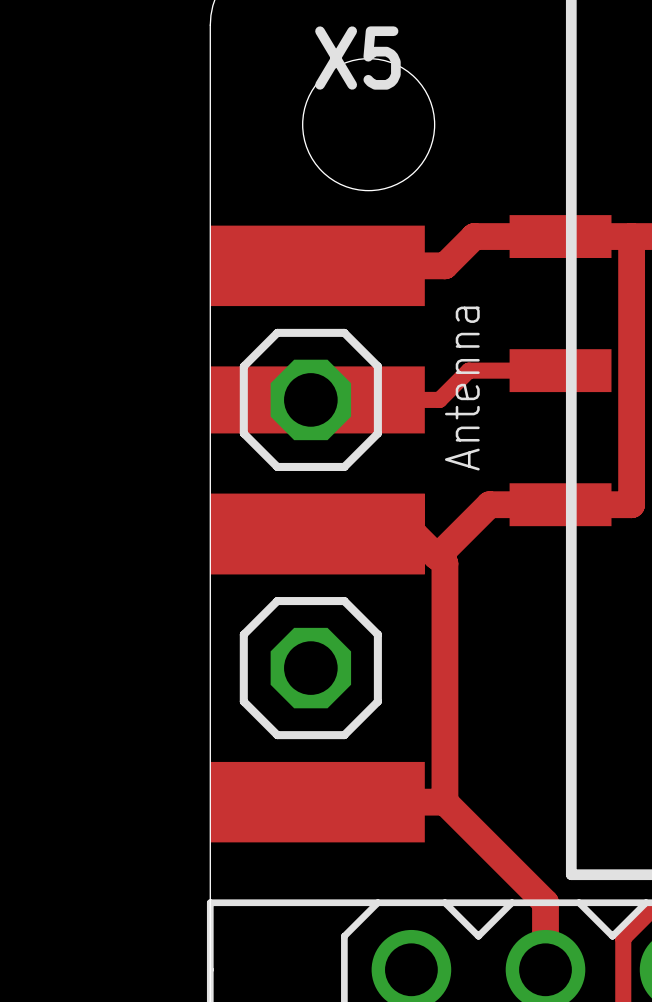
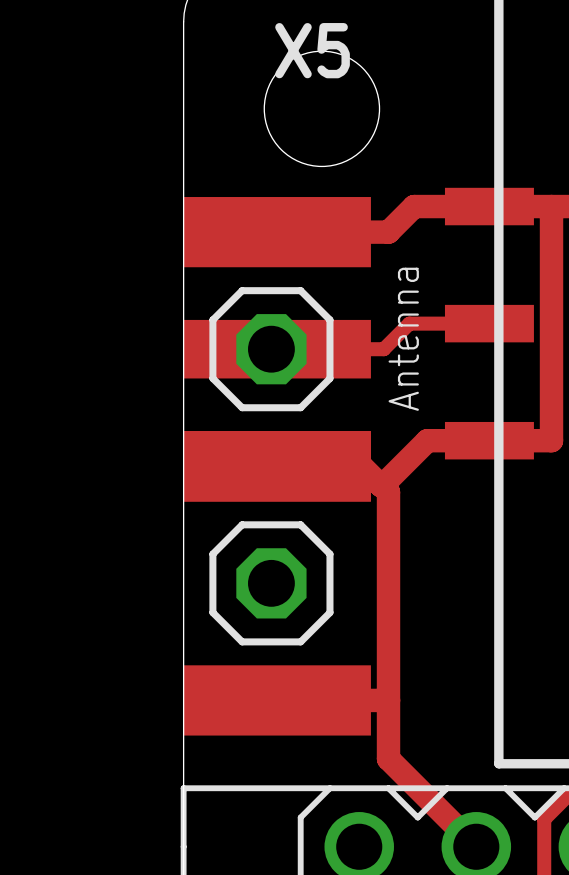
track: (444, 802) (545, 902) (545, 969) -> (388, 700) (388, 758) (476, 846)

